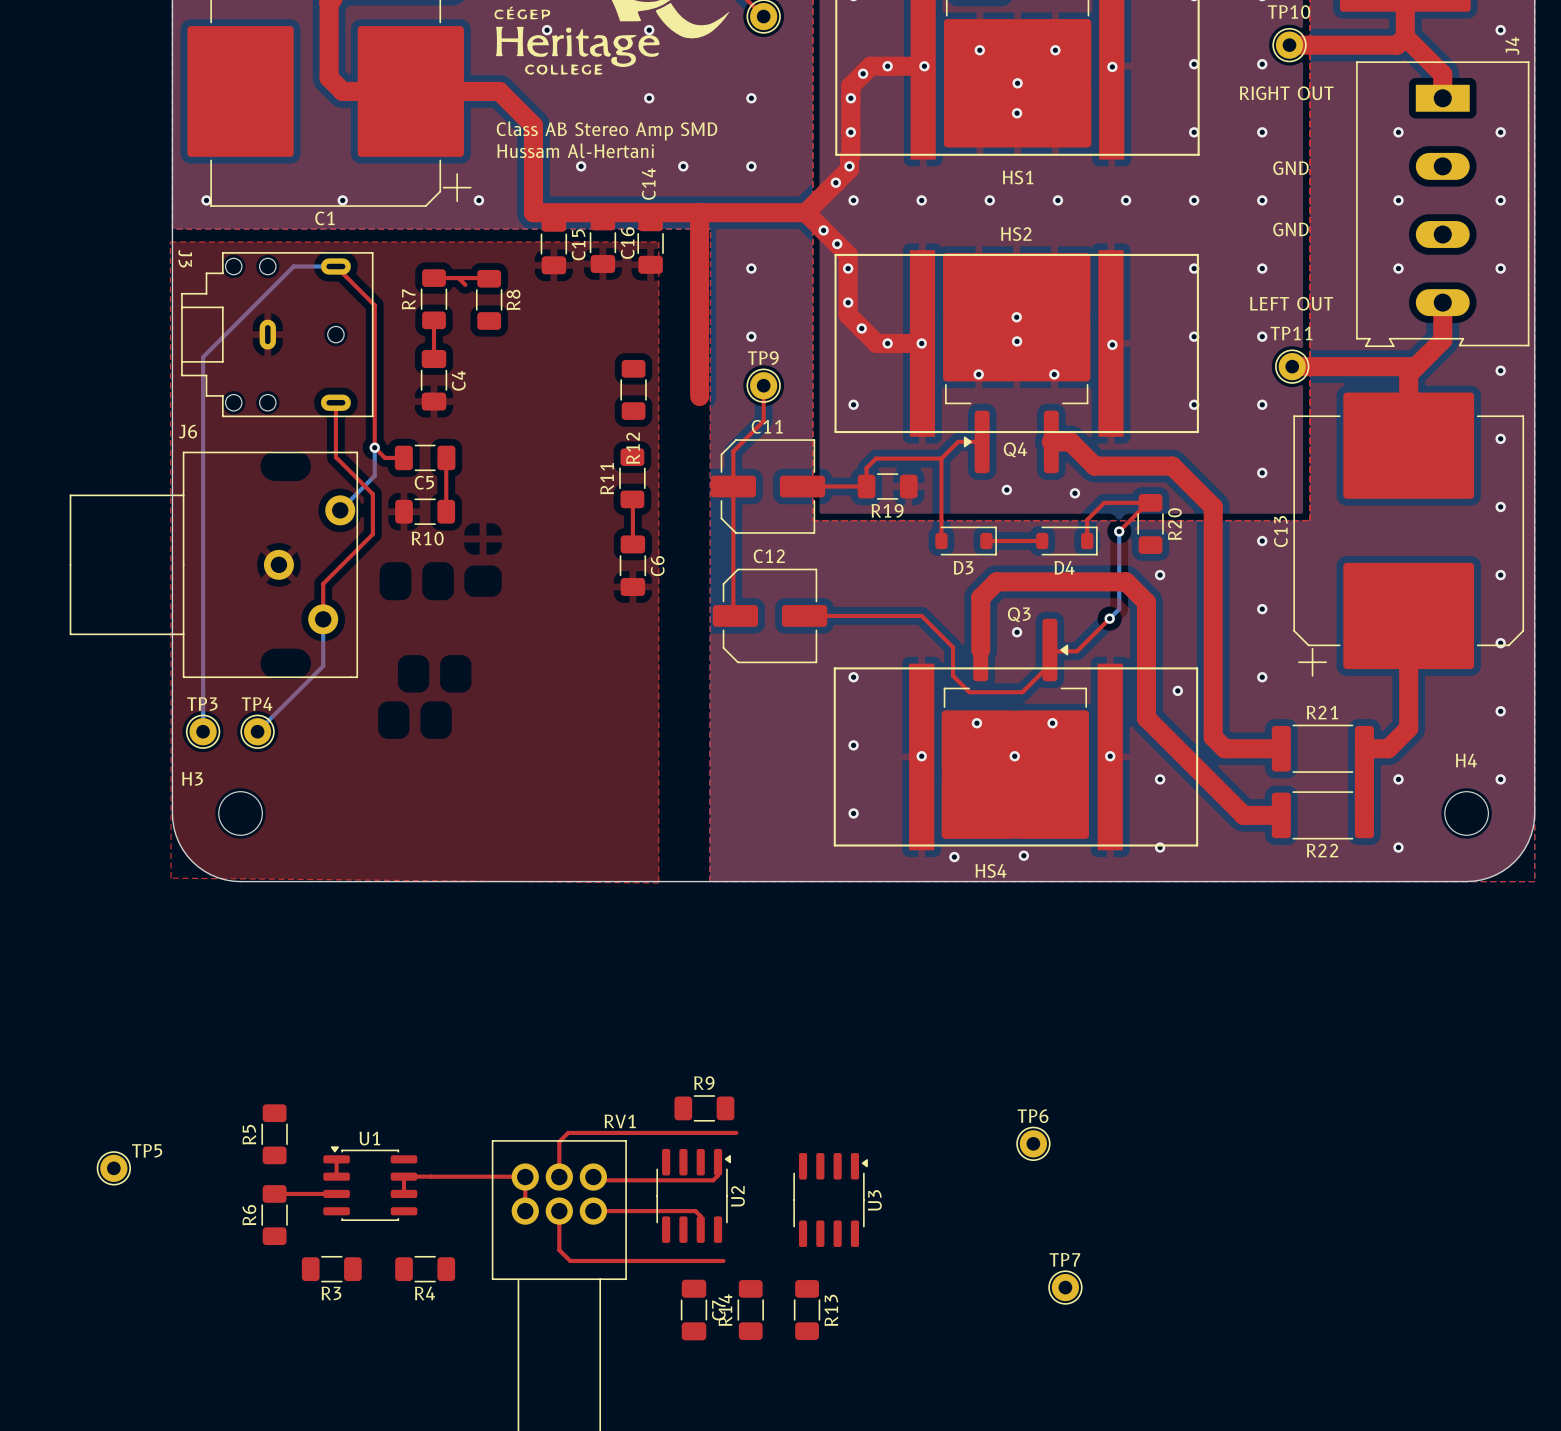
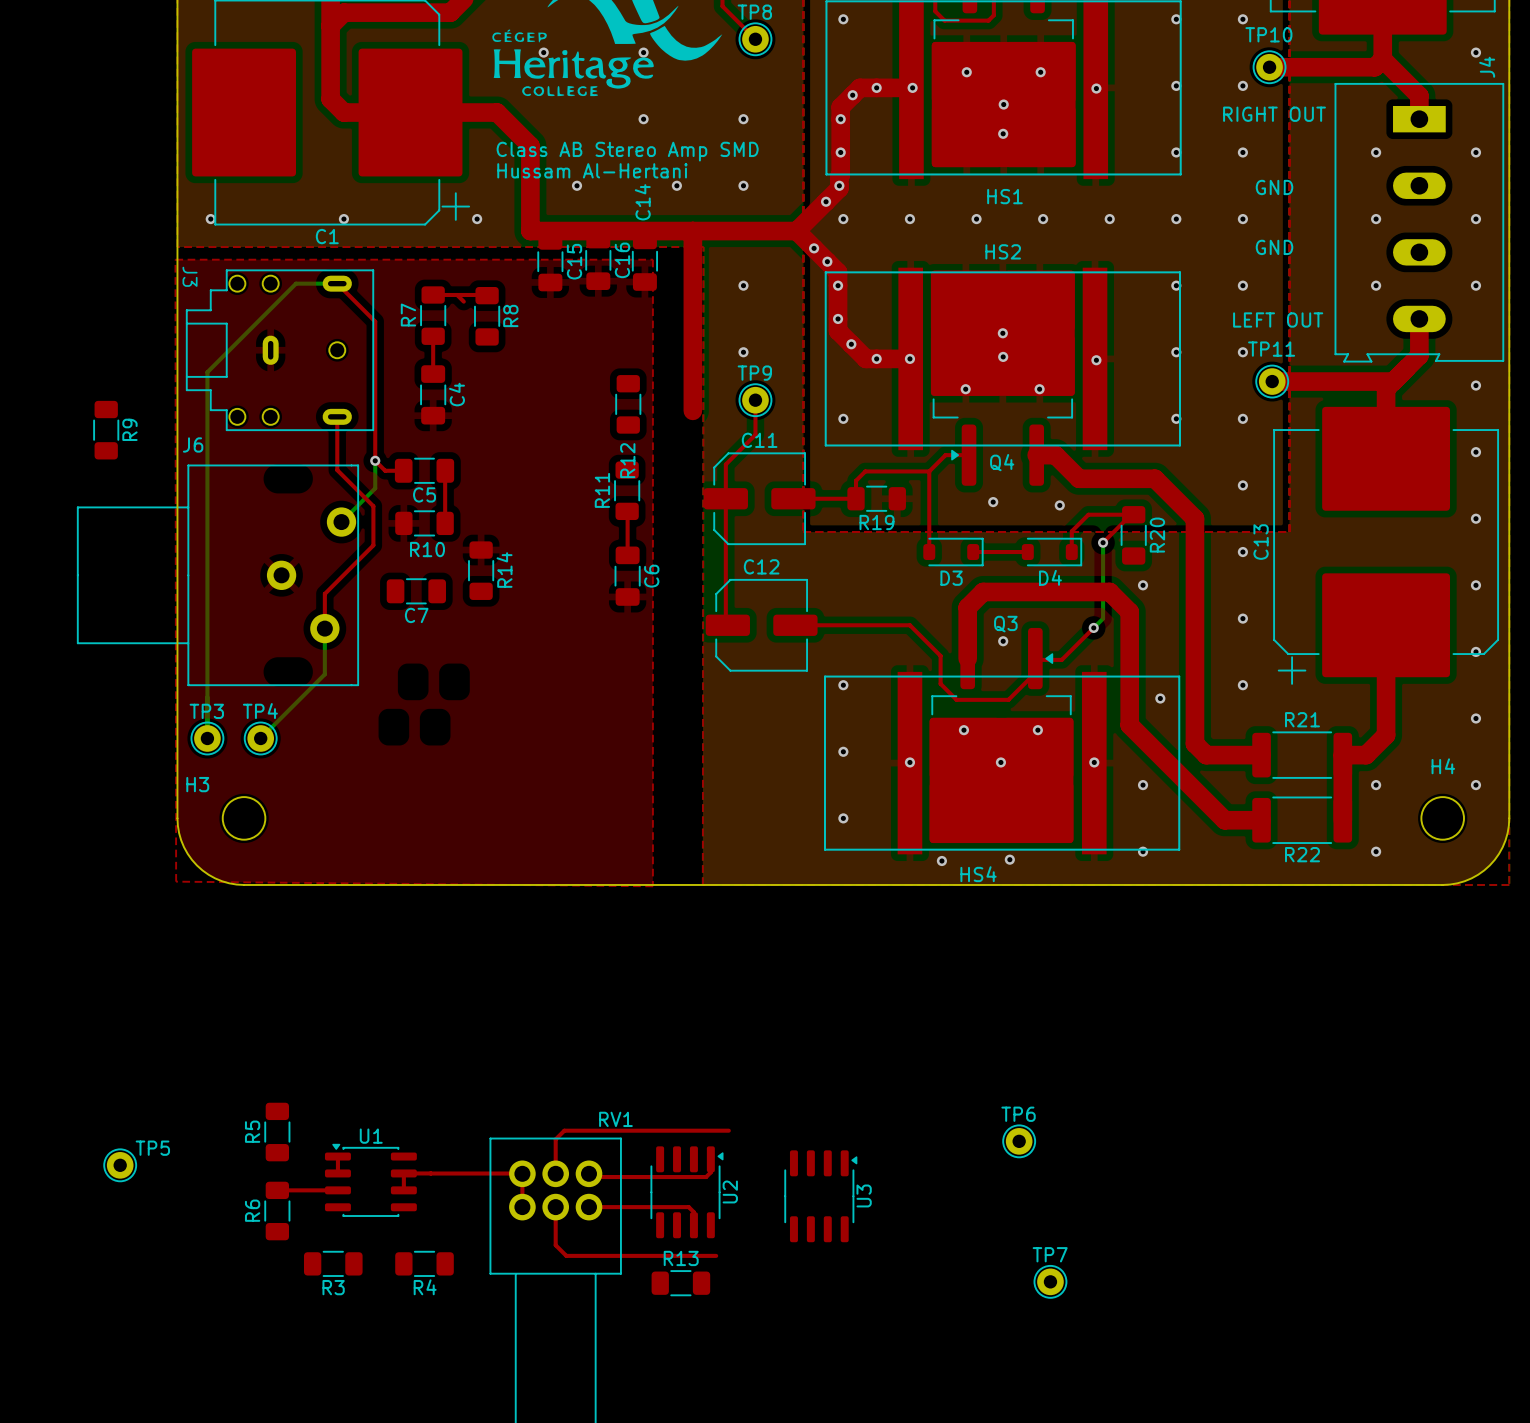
R9 rotation: 0° (704, 1108) -> 90° clockwise (106, 430)
R9 position: (704, 1108) -> (106, 430)
C7 rotation: 0° (693, 1310) -> 90° clockwise (416, 591)
C7 position: (693, 1310) -> (416, 591)
R14 name position: R14 (725, 1310) -> R14 (504, 570)
R14 position: (750, 1310) -> (481, 570)
R13 rotation: 0° (807, 1310) -> 90° clockwise (680, 1283)
R13 position: (807, 1310) -> (680, 1283)
R13 name position: R13 (831, 1310) -> R13 (681, 1258)

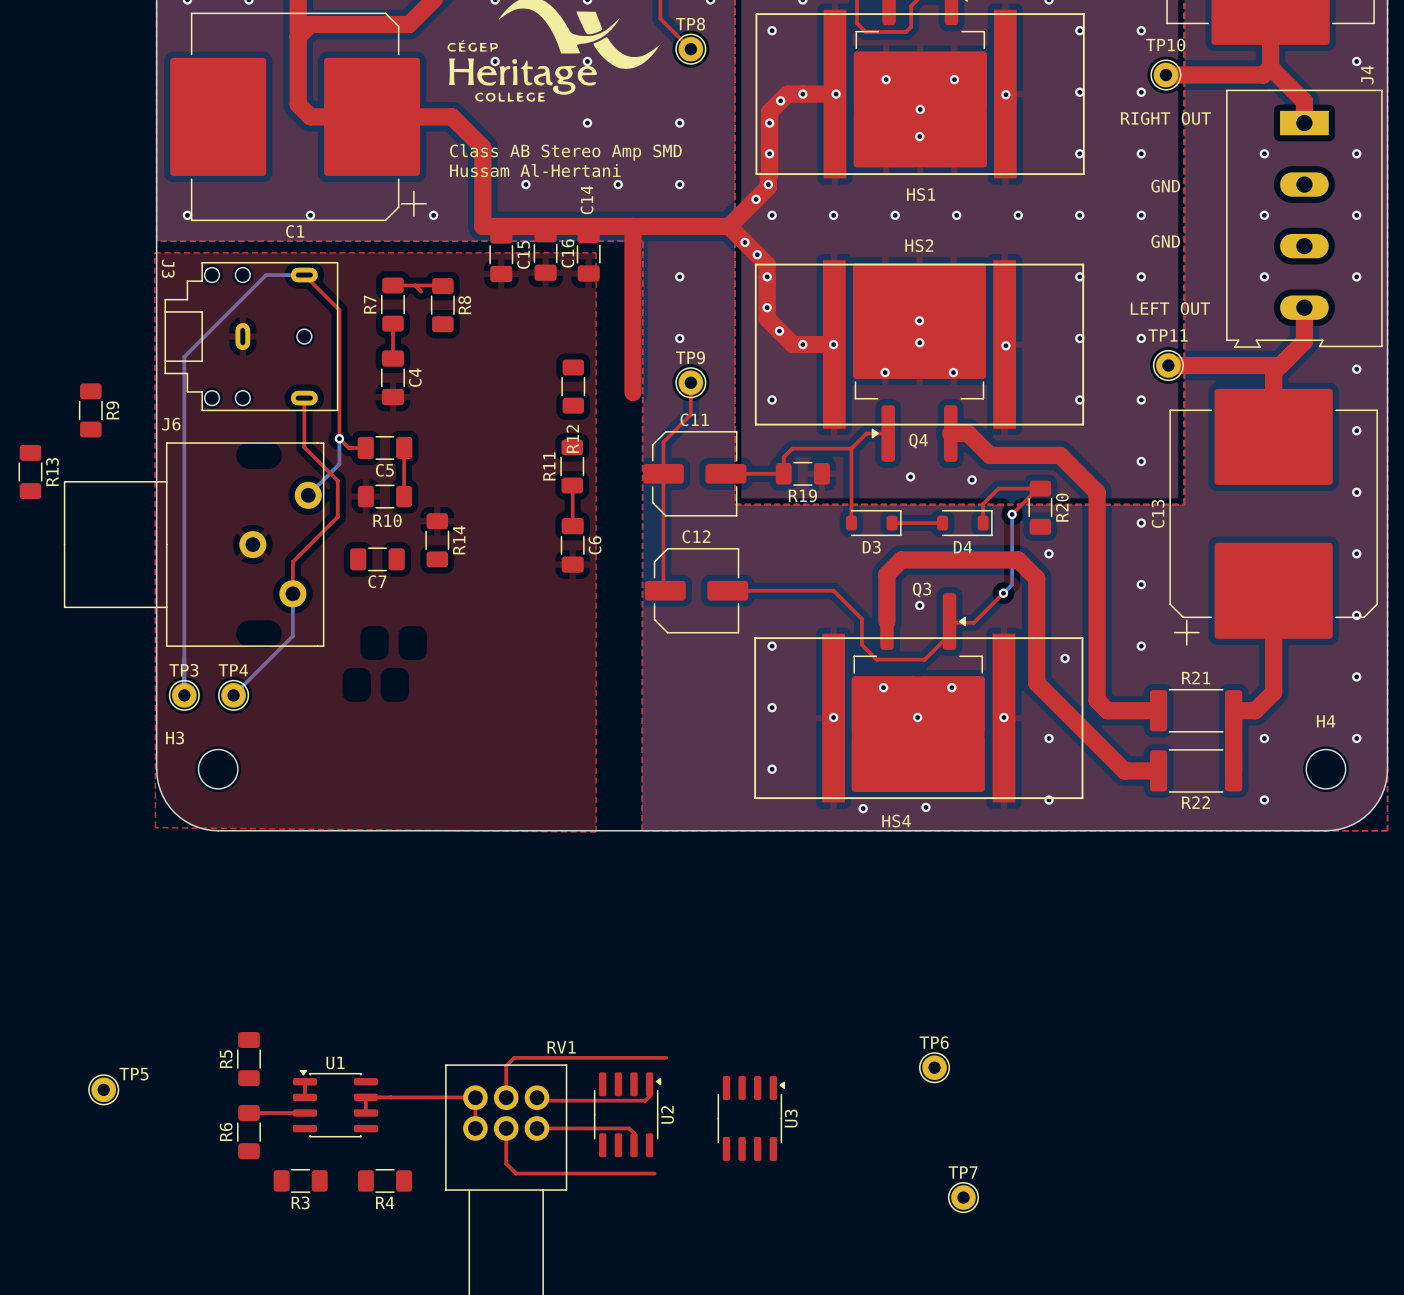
R13 rotation: 0° (680, 1283) -> 90° clockwise (30, 471)
R13 position: (680, 1283) -> (30, 471)

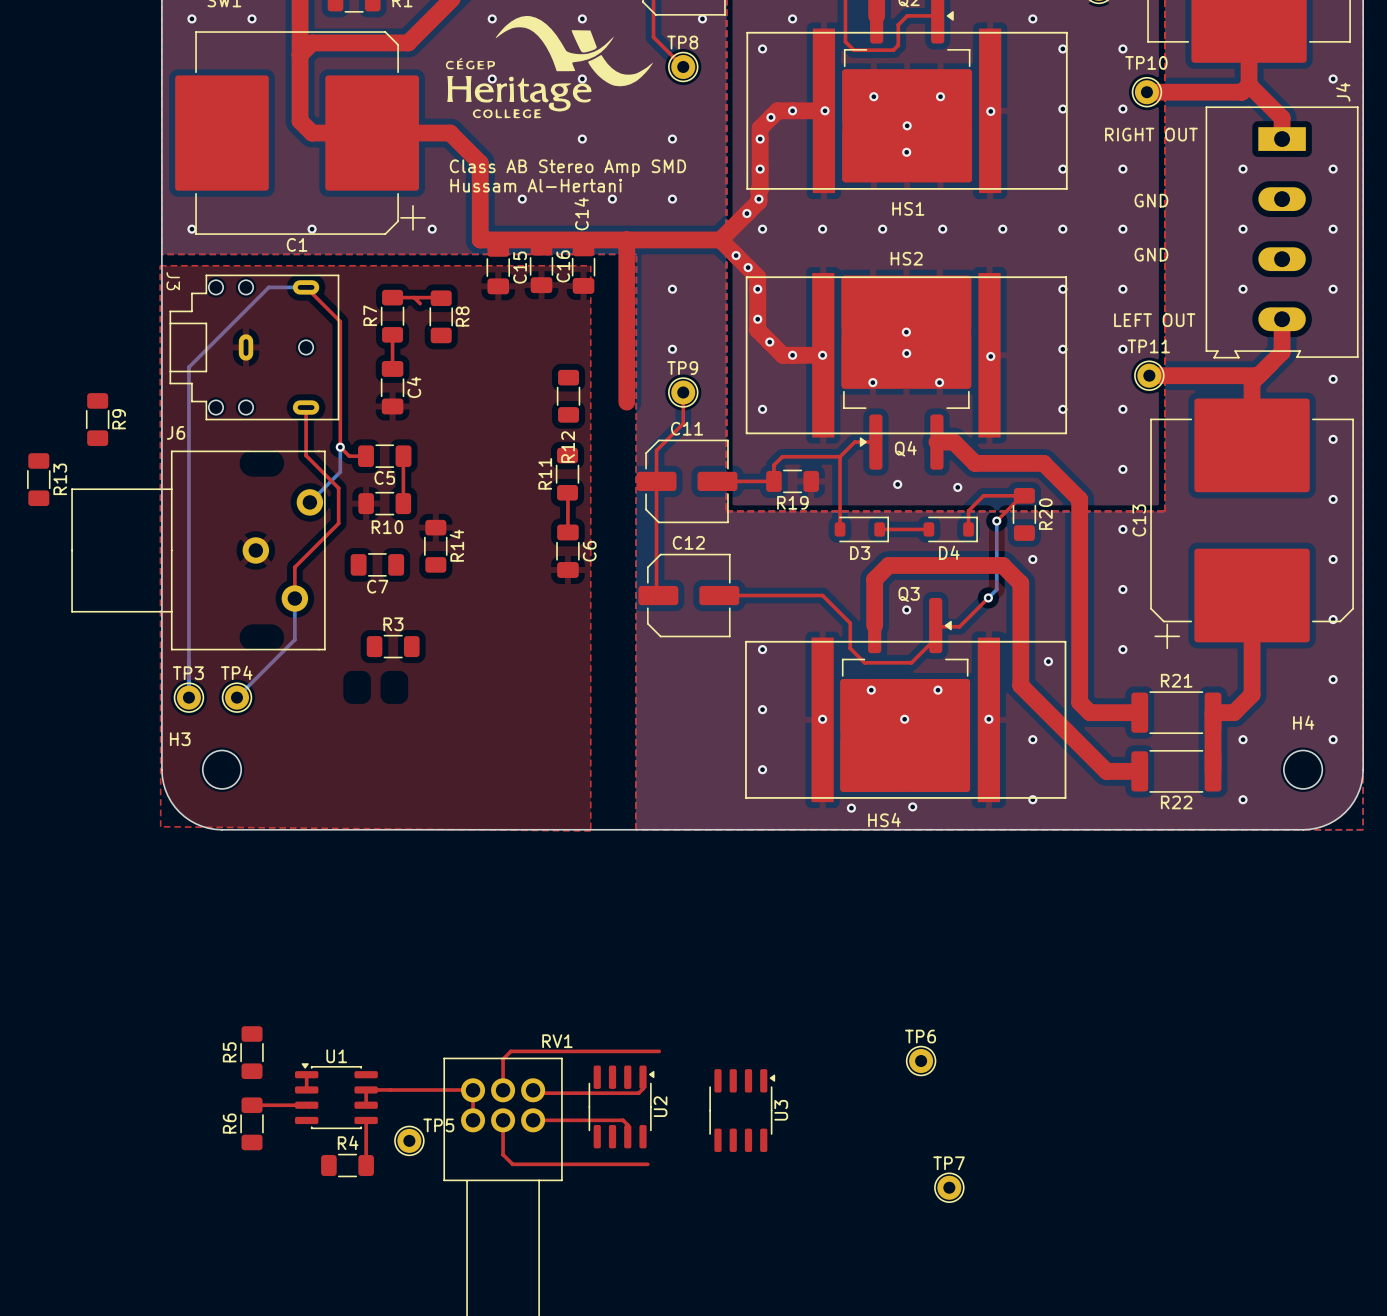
TP5 position: (103, 1089) -> (409, 1140)
top track: none -> (366, 1120) (366, 1165)
R3 position: (300, 1180) -> (393, 646)
R4 position: (384, 1180) -> (347, 1165)
R3 name position: R3 (300, 1202) -> R3 (393, 624)
R4 name position: R4 (385, 1202) -> R4 (348, 1142)

